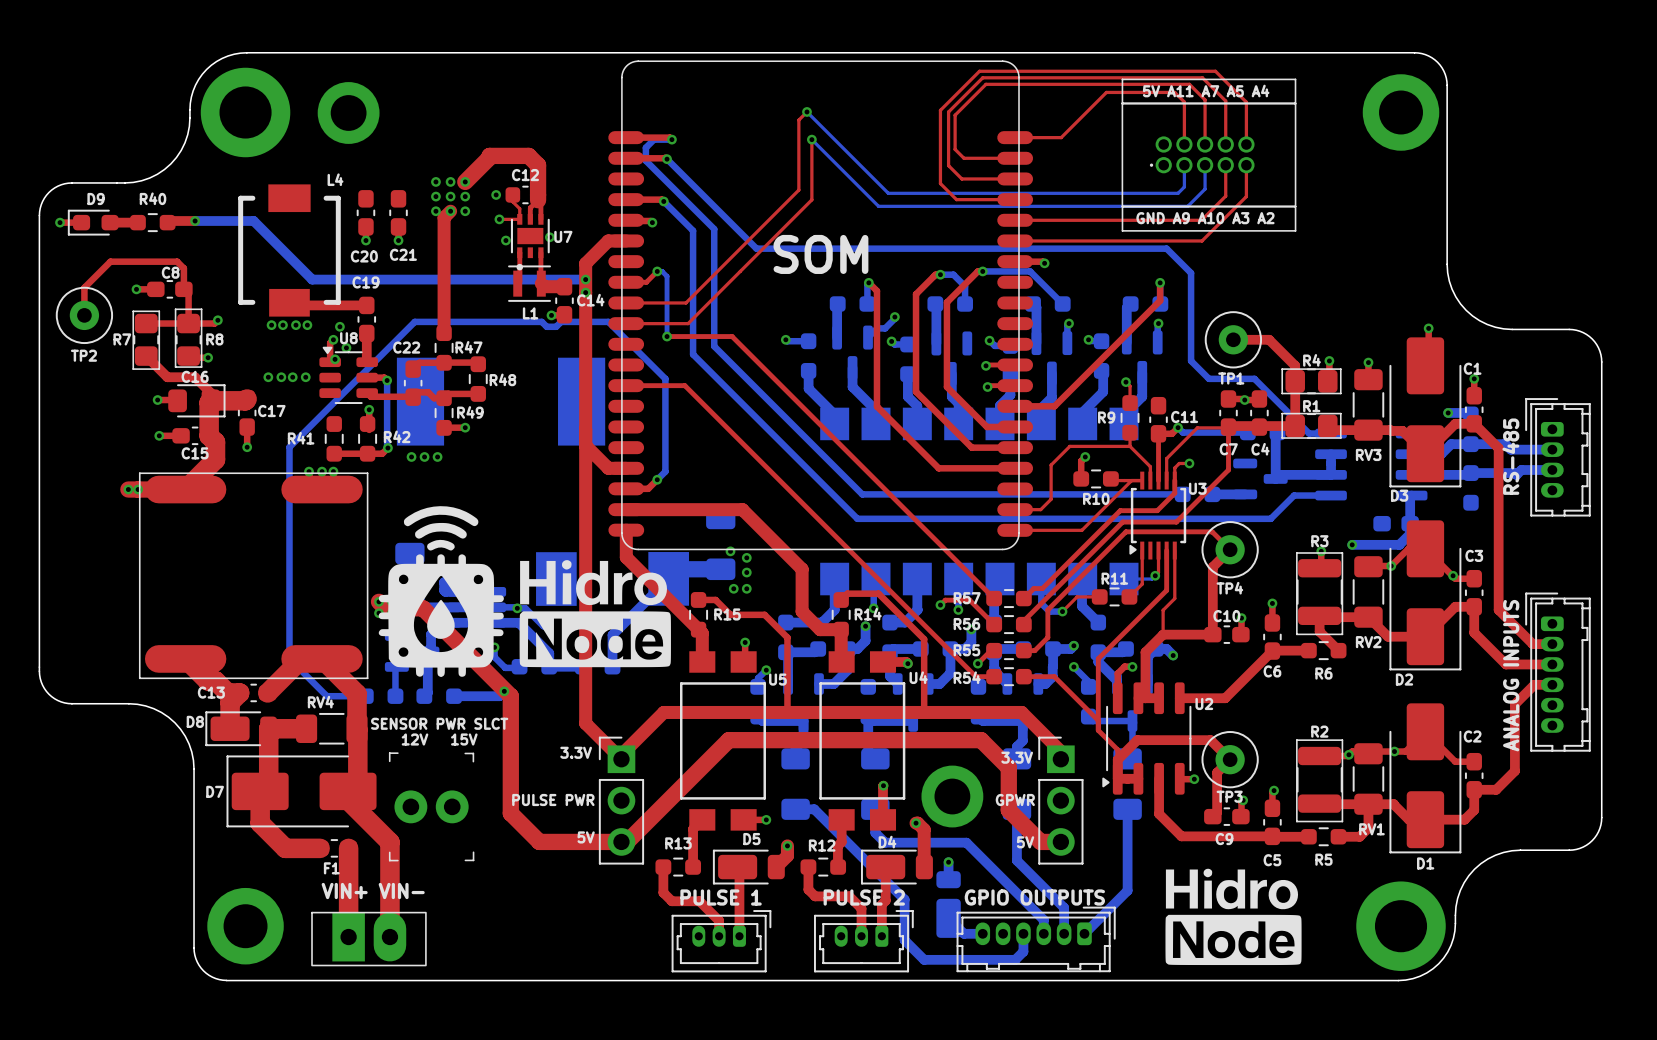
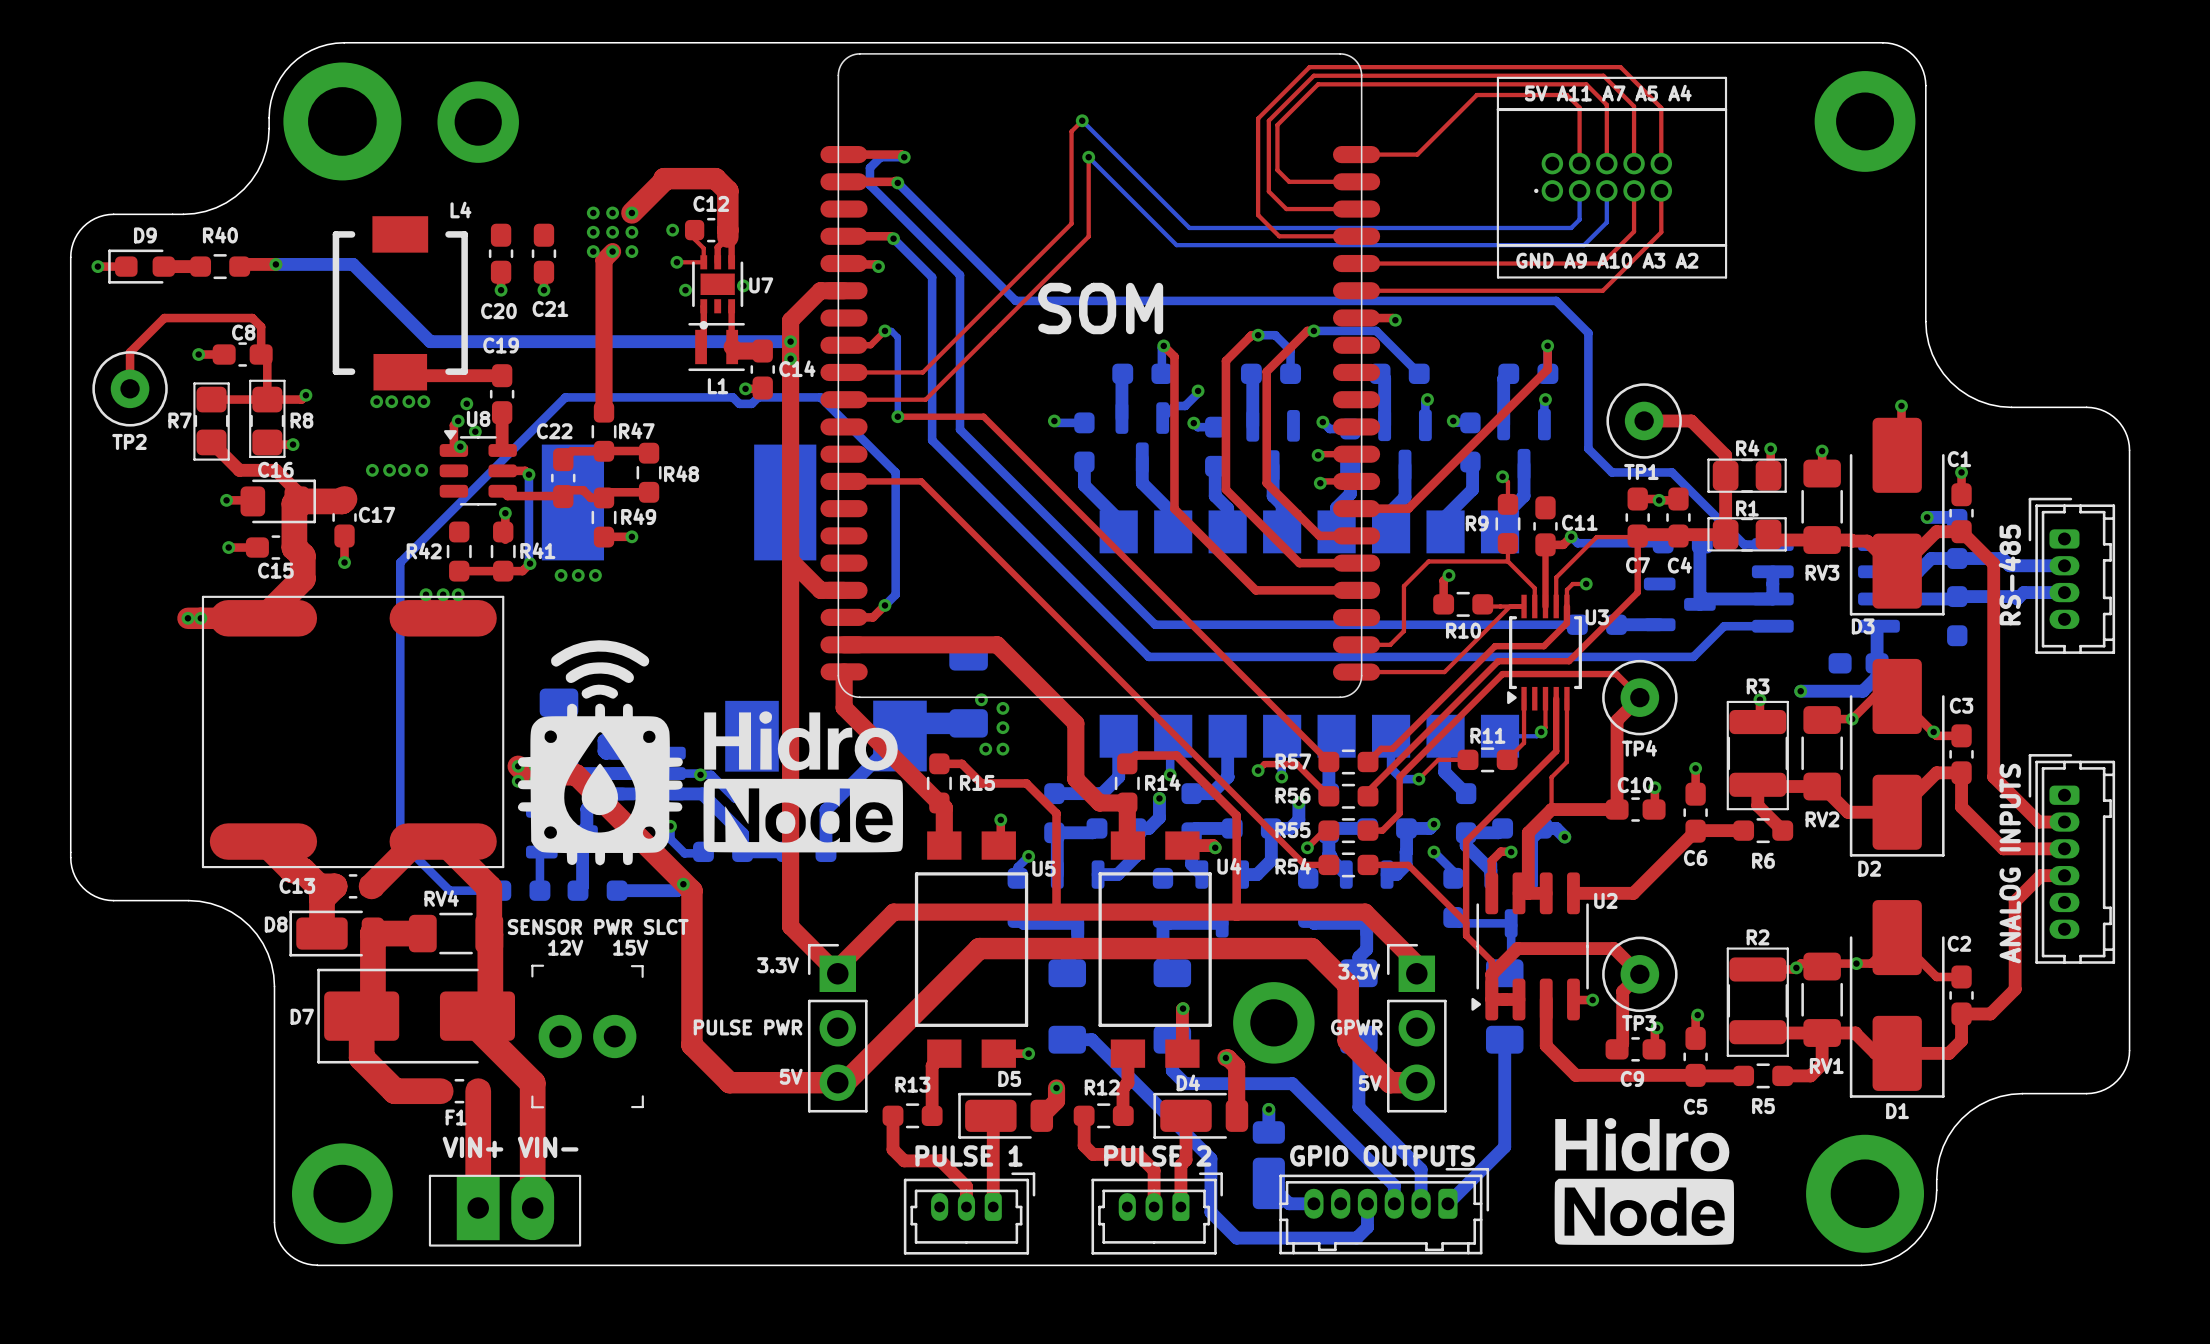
R42 name position: R42 (397, 436) -> R42 (424, 551)
R41 name position: R41 (301, 438) -> R41 (537, 550)

